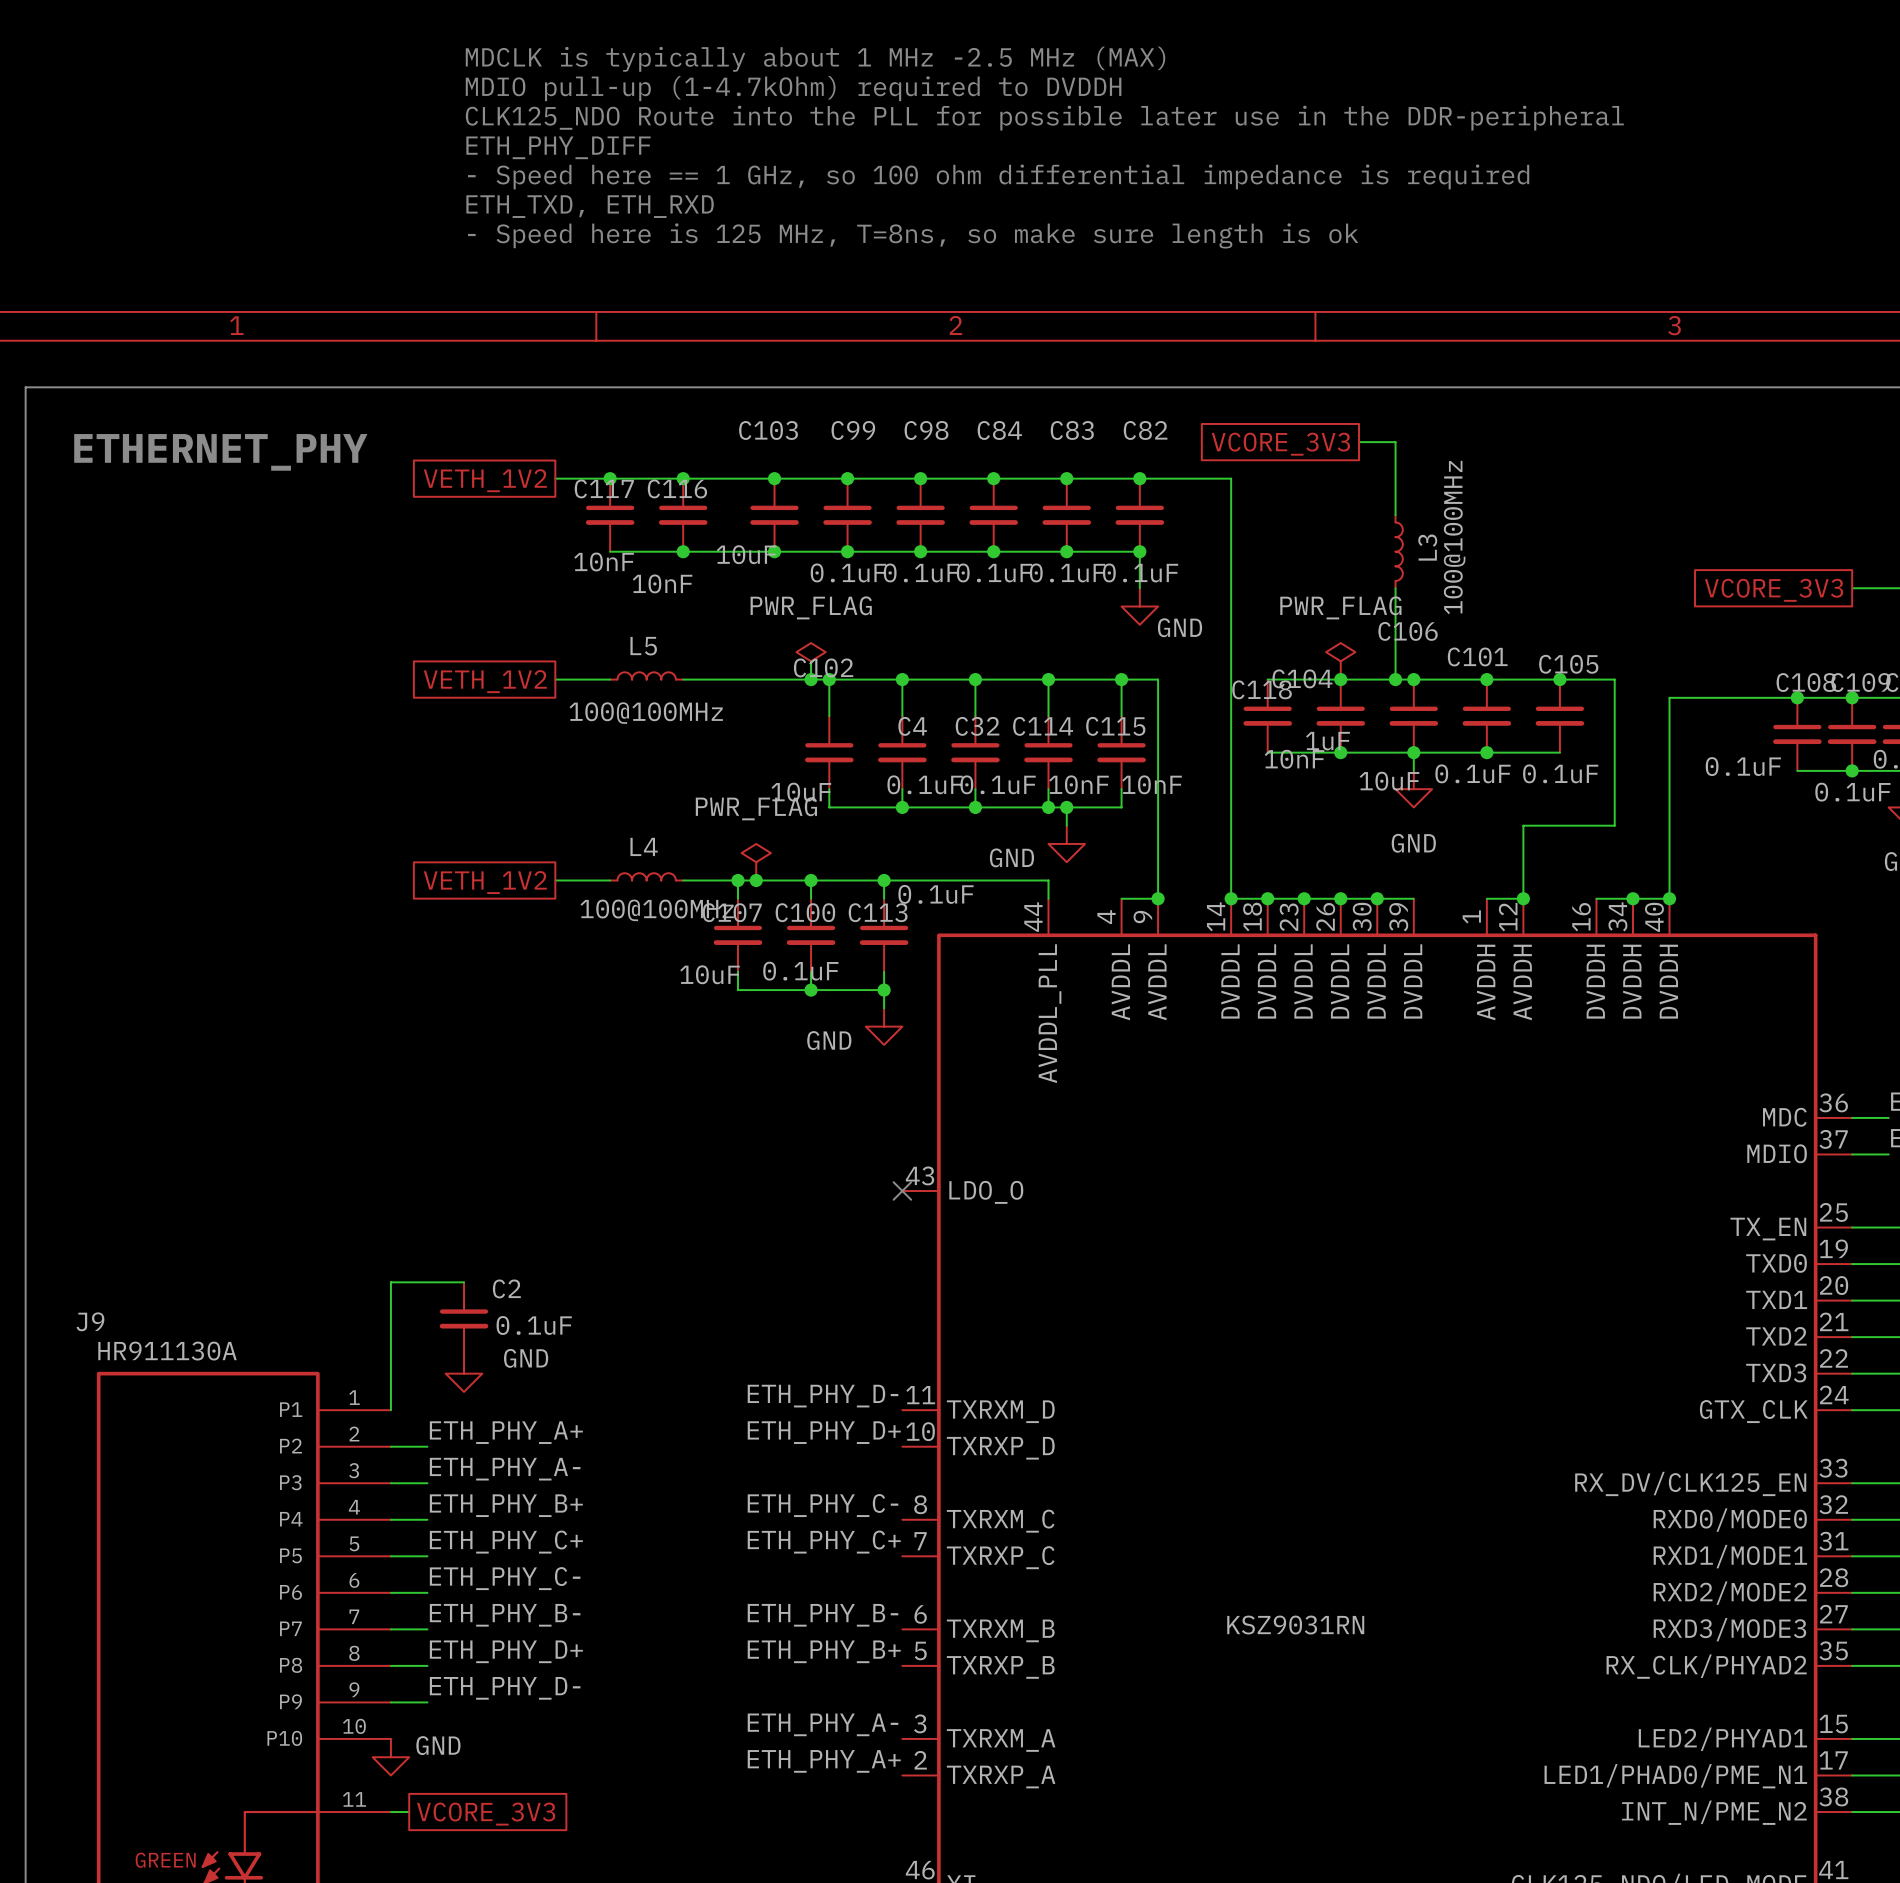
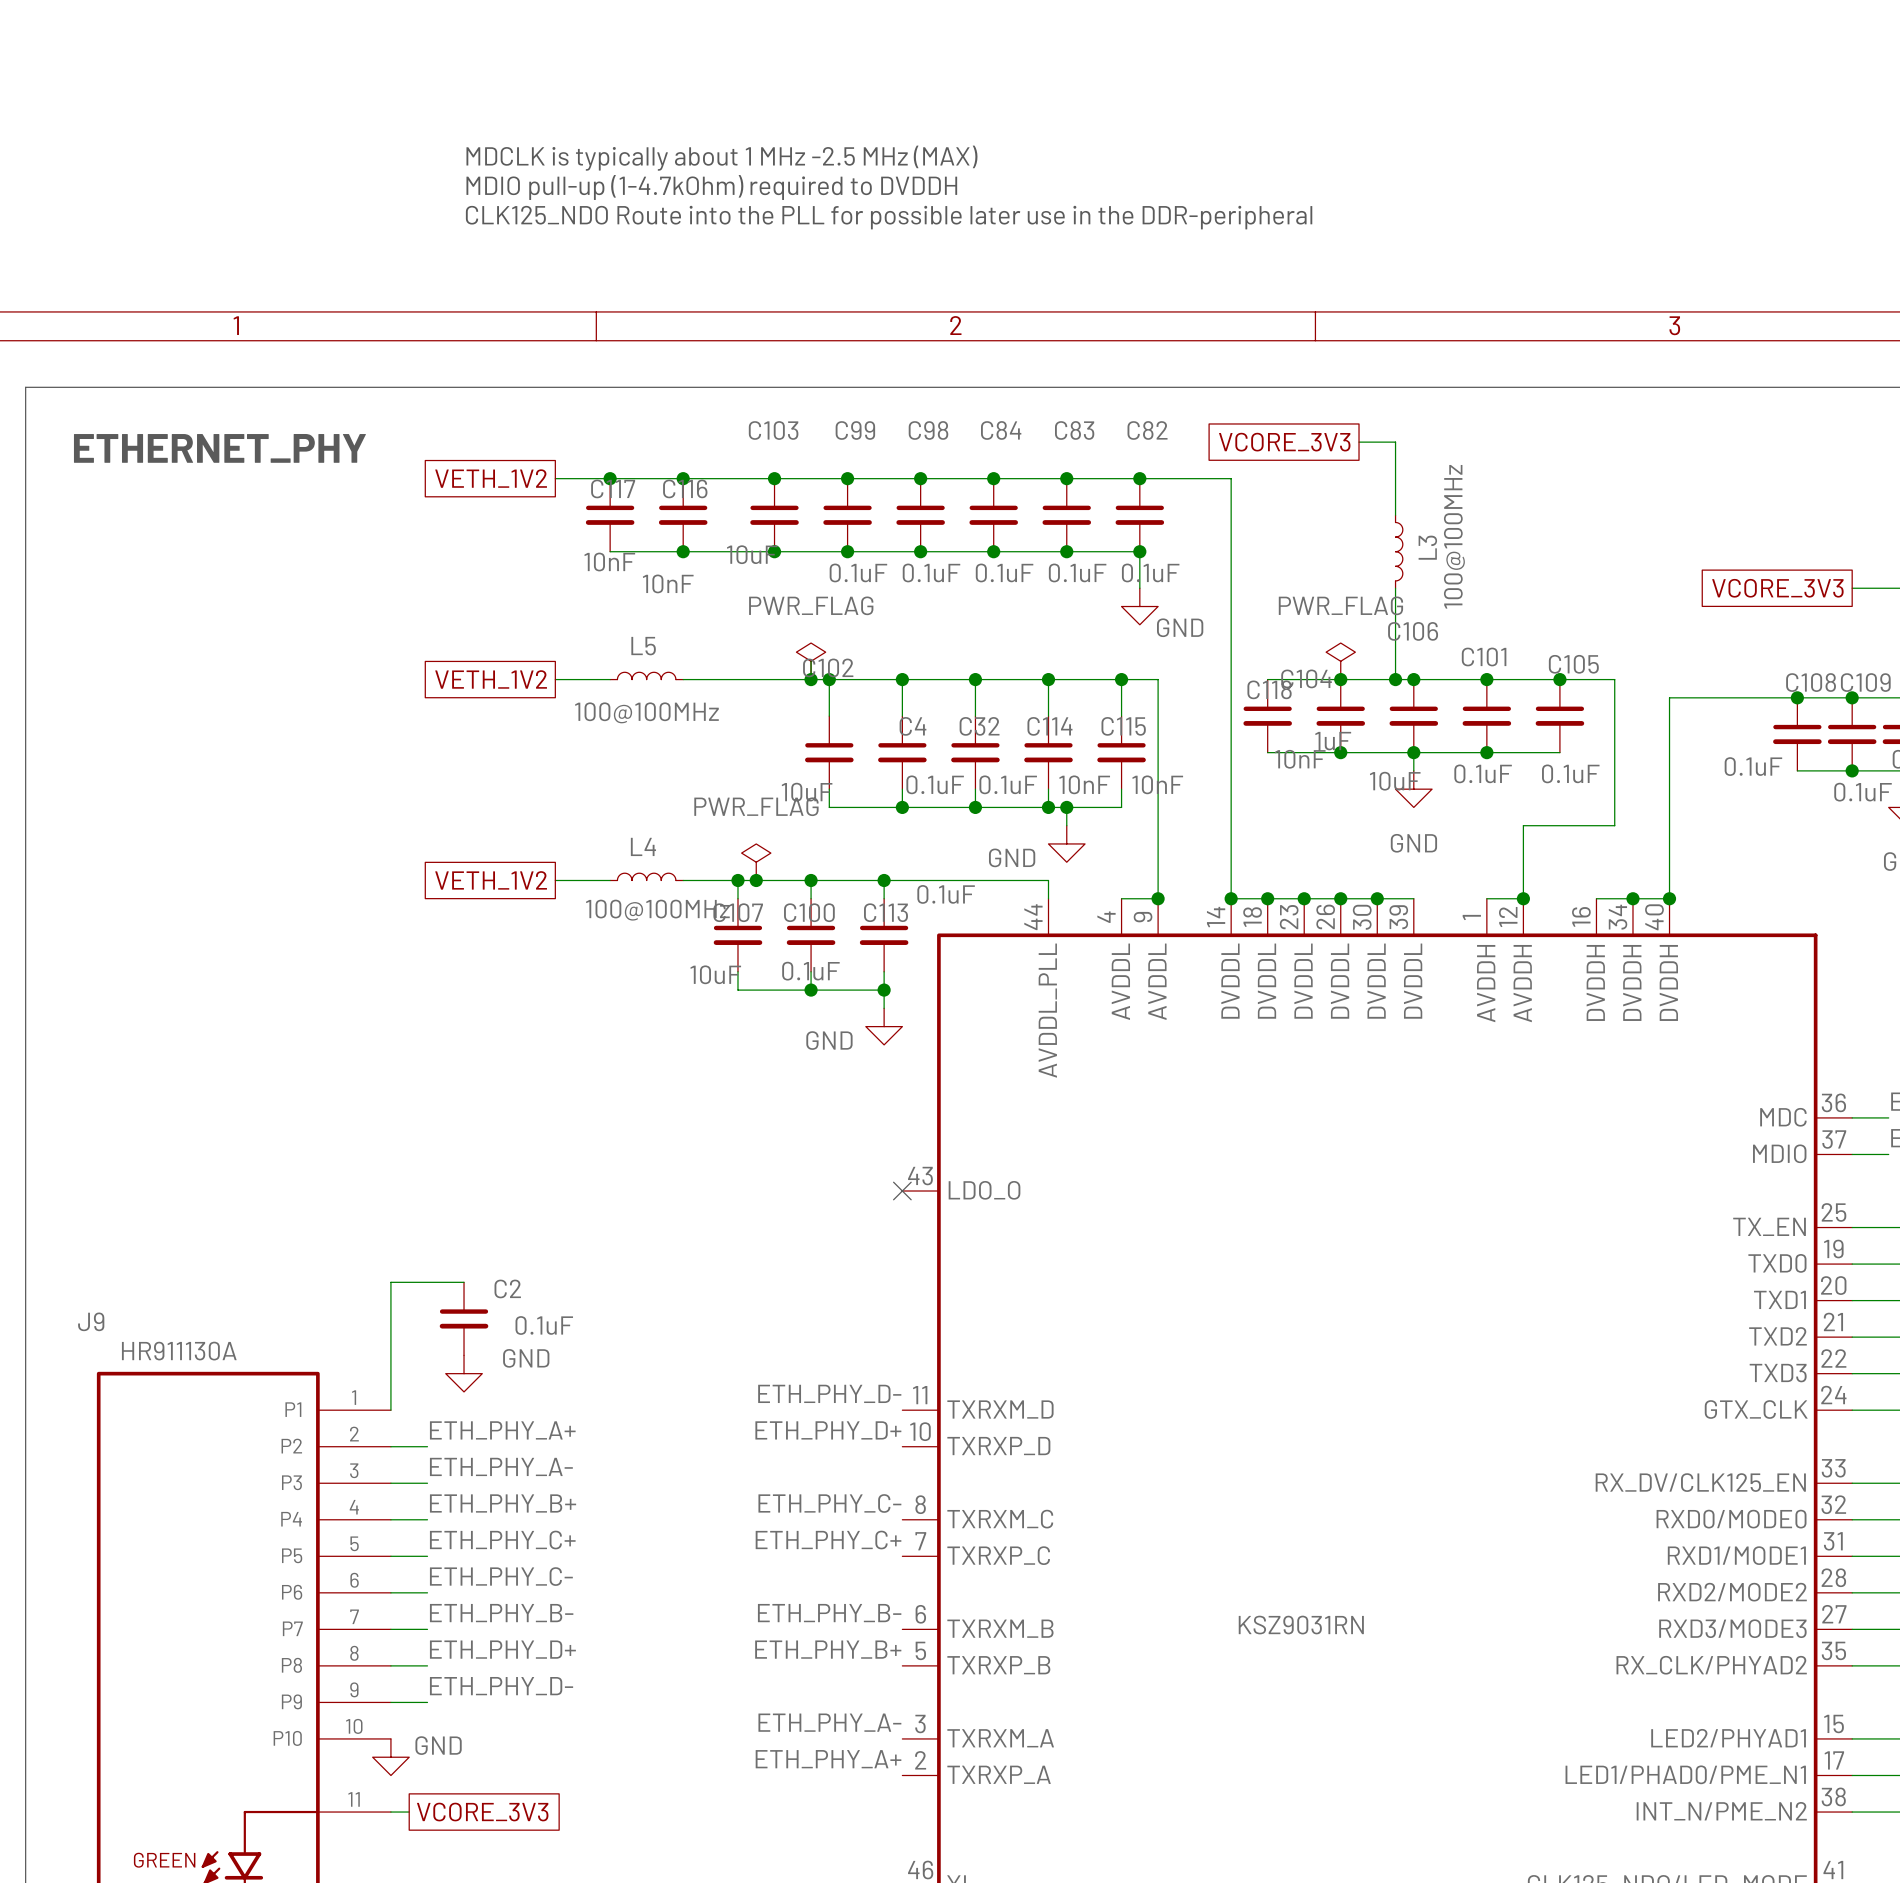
text position: MDCLK is typically about 1 MHz -2.5 MHz (MAX) (815, 59) -> MDCLK is typically about 1 MHz -2.5 MHz (MAX) (721, 158)
text position: MDIO pull-up (1-4.7kOhm) required to DVDDH (793, 88) -> MDIO pull-up (1-4.7kOhm) required to DVDDH (711, 187)
text position: CLK125_NDO Route into the PLL for possible later use in the DDR-peripheral (1044, 118) -> CLK125_NDO Route into the PLL for possible later use in the DDR-peripheral (889, 217)
text: ETH_PHY_DIFF (558, 147) -> none
text: - Speed here == 1 GHz, so 100 ohm differential impedance is required (998, 176) -> none
text: ETH_TXD, ETH_RXD (590, 206) -> none
text: - Speed here is 125 MHz, T=8ns, so make sure length is ok (913, 235) -> none

